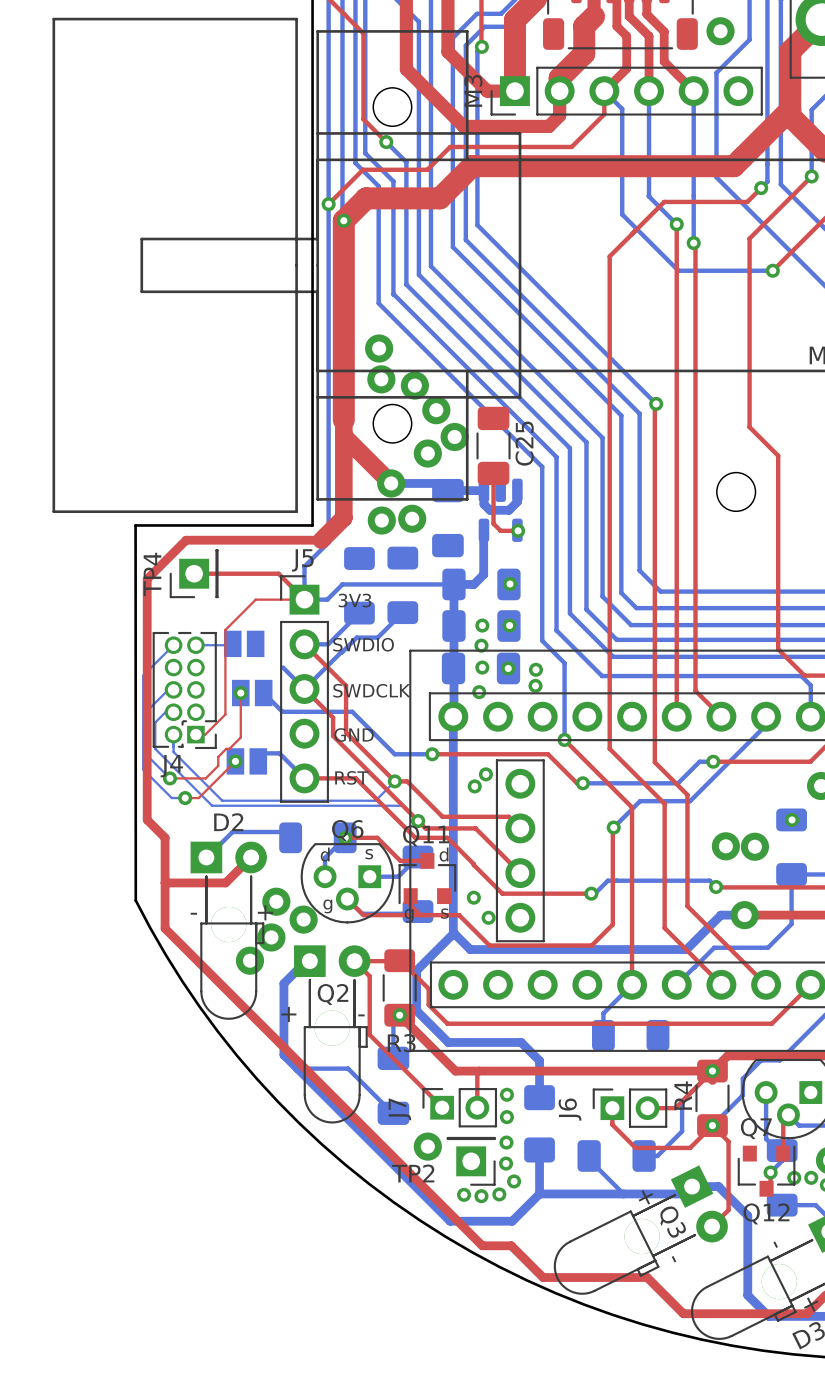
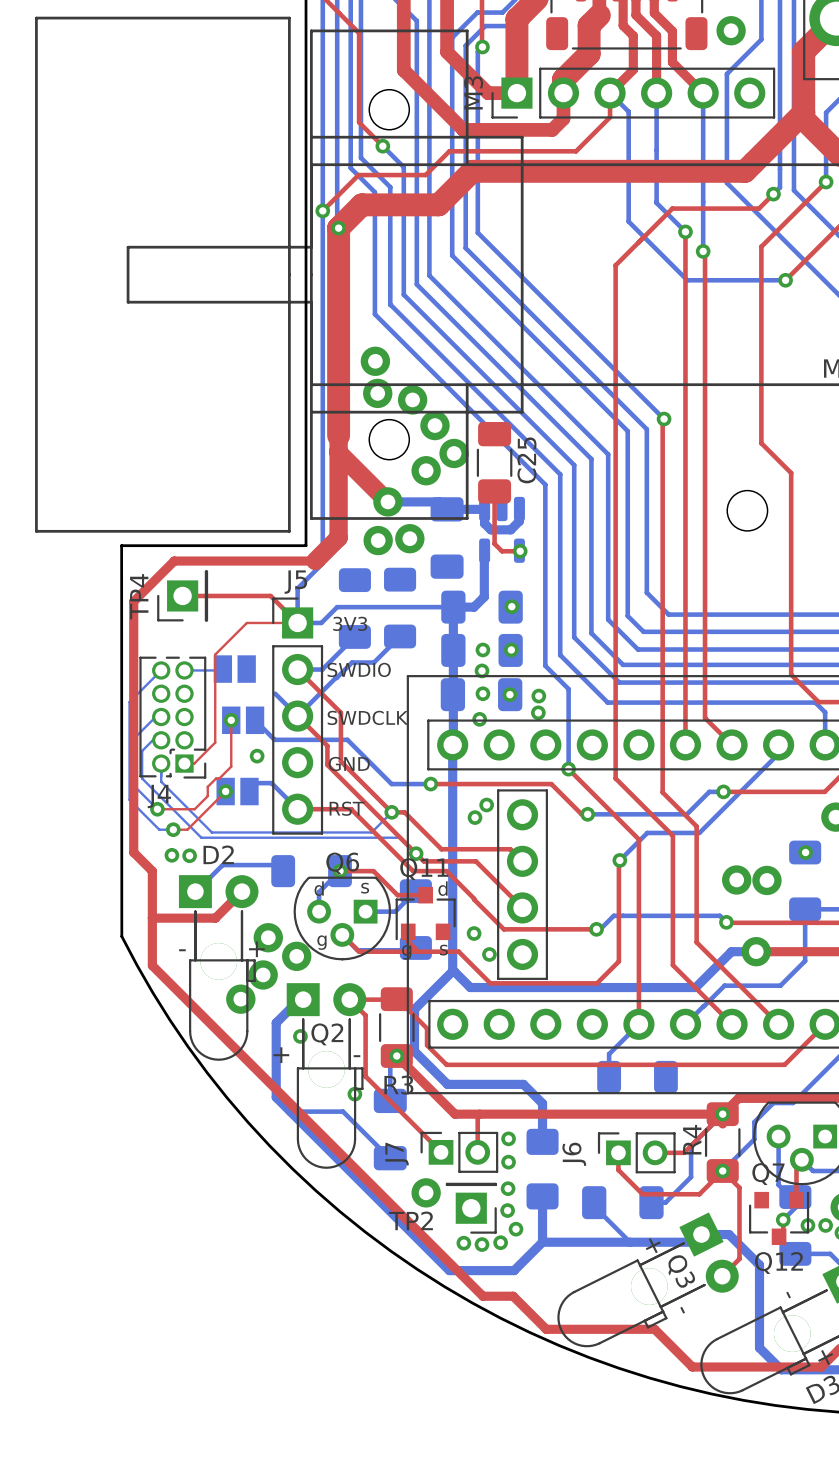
via: none -> (257, 756)
via: none -> (171, 855)
via: none -> (189, 855)
via: none -> (300, 1036)
via: none -> (354, 1094)

